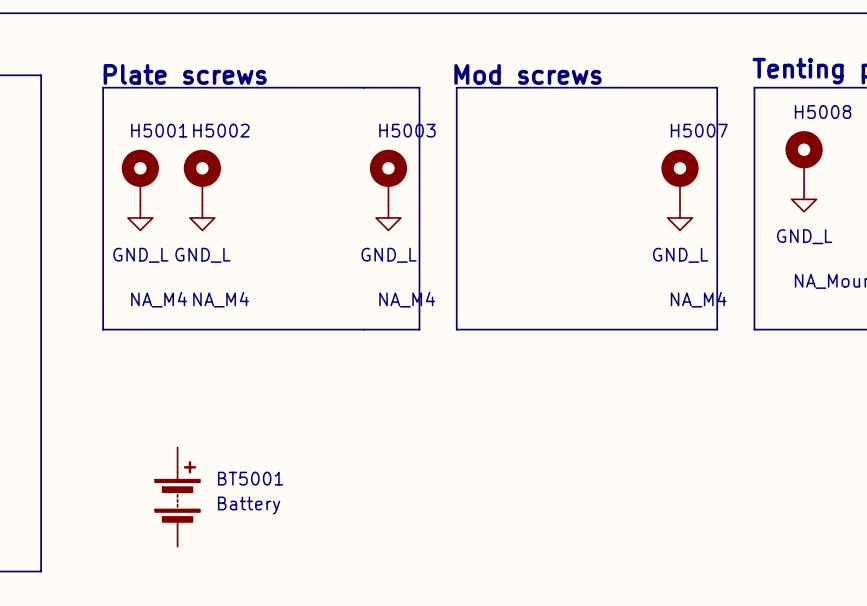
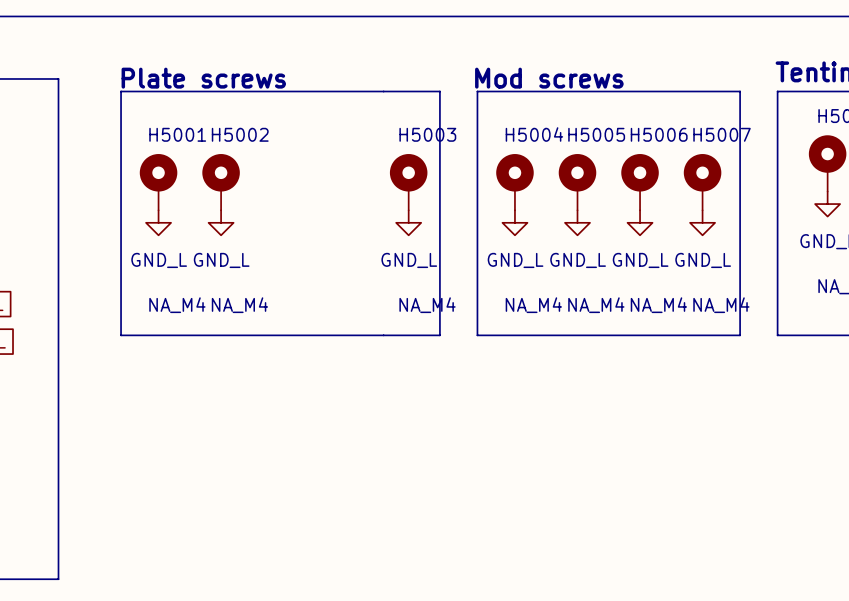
H5004: none -> NA_M4 (514, 182)
H5005: none -> NA_M4 (577, 182)
H5006: none -> NA_M4 (640, 182)
power symbol: none -> GND_L (514, 222)
power symbol: none -> GND_L (577, 222)
power symbol: none -> GND_L (640, 222)
BT5001: Battery (177, 497) -> none

